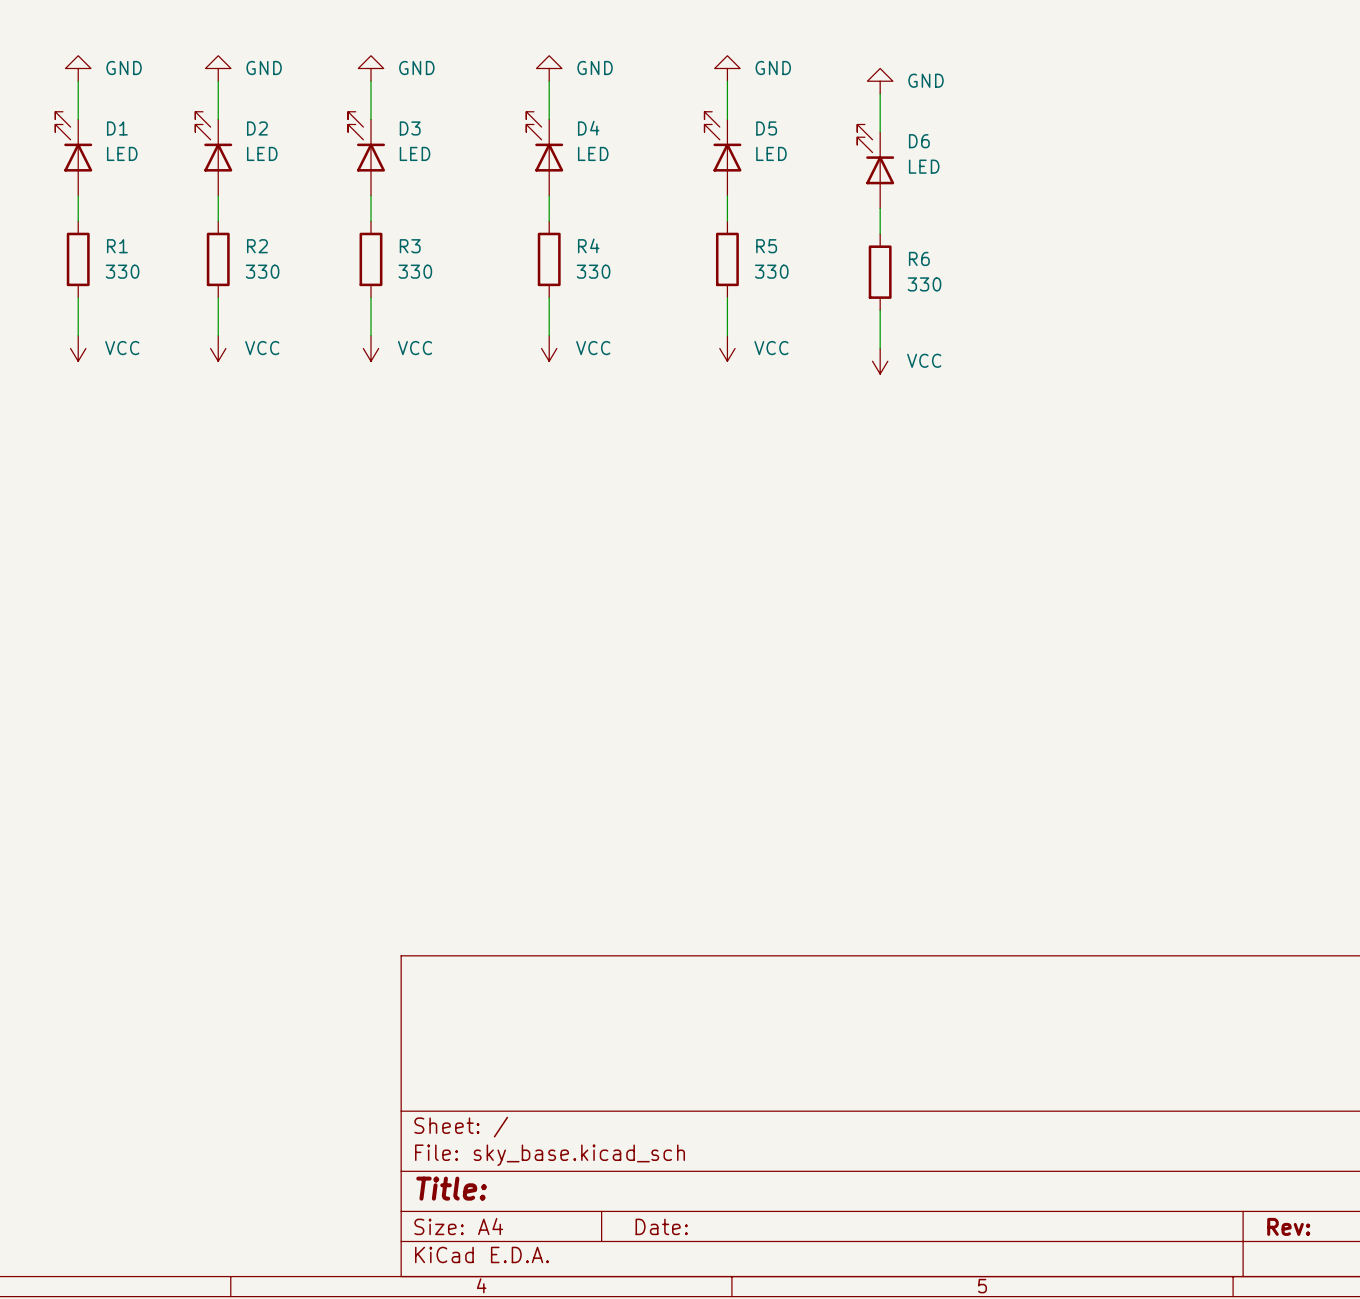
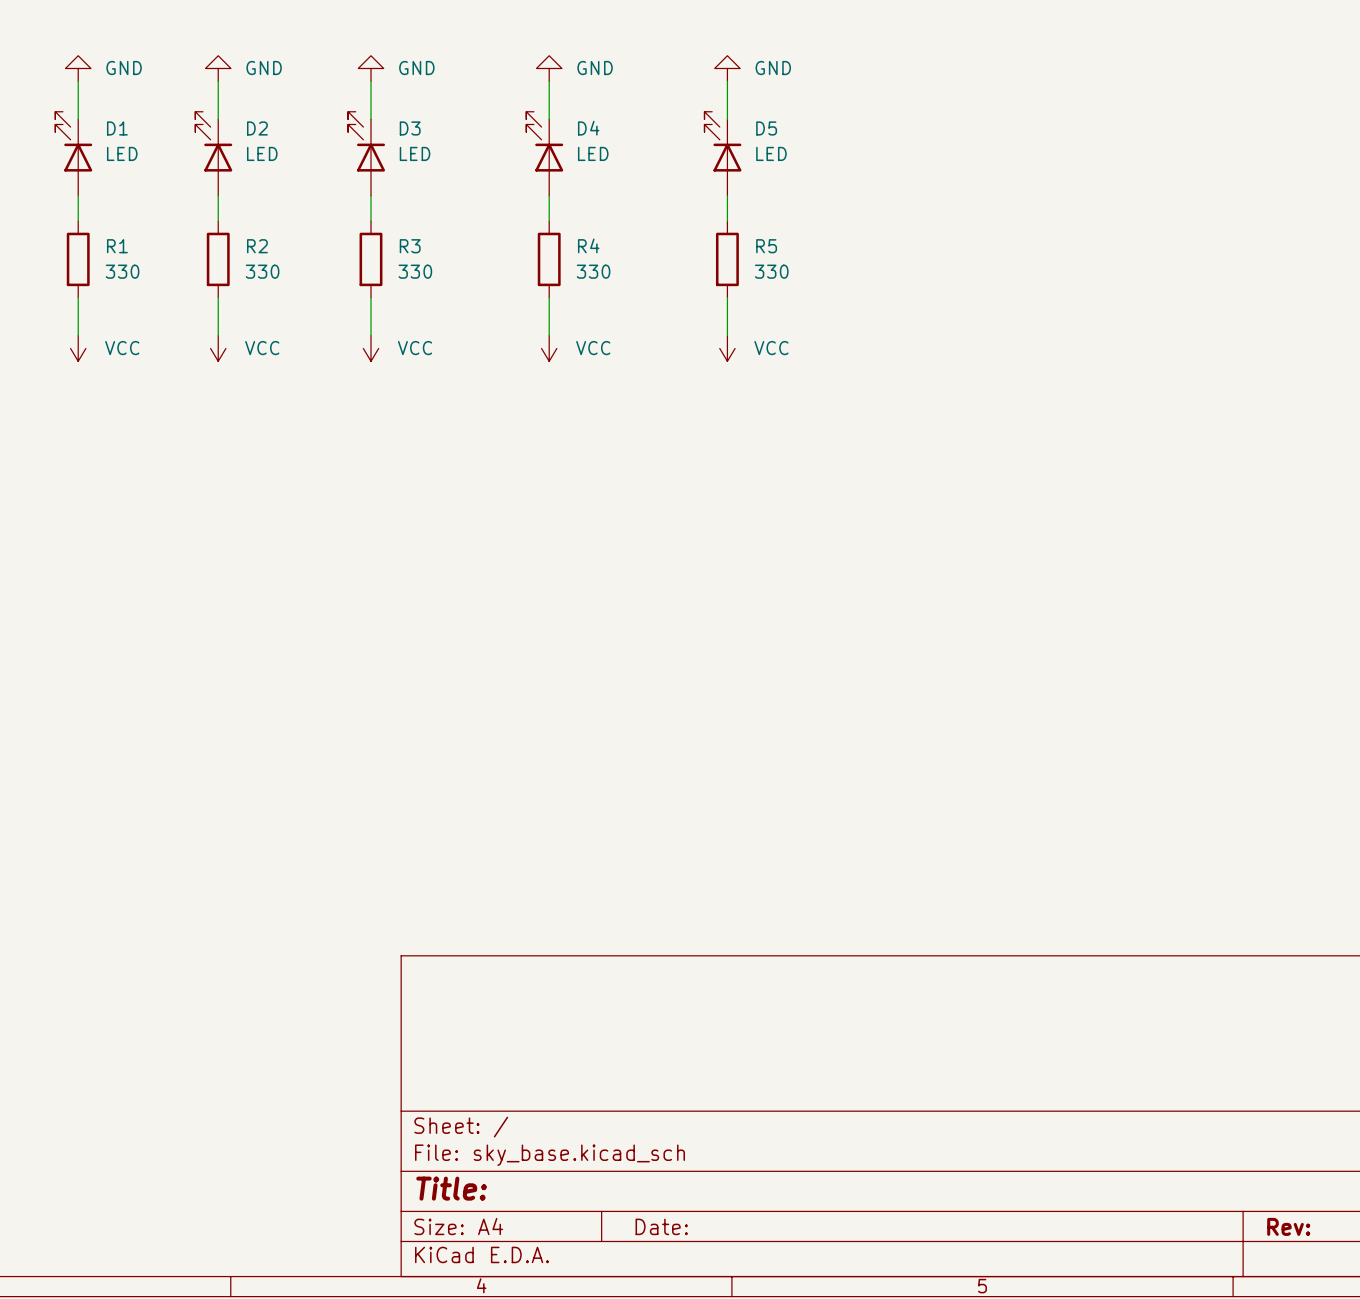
power symbol: GND (880, 81) -> none
wire: (880, 93) (880, 132) -> none
D6: LED (875, 166) -> none
wire: (880, 208) (880, 233) -> none
R6: 330 (880, 272) -> none
wire: (880, 310) (880, 348) -> none
power symbol: VCC (880, 361) -> none

